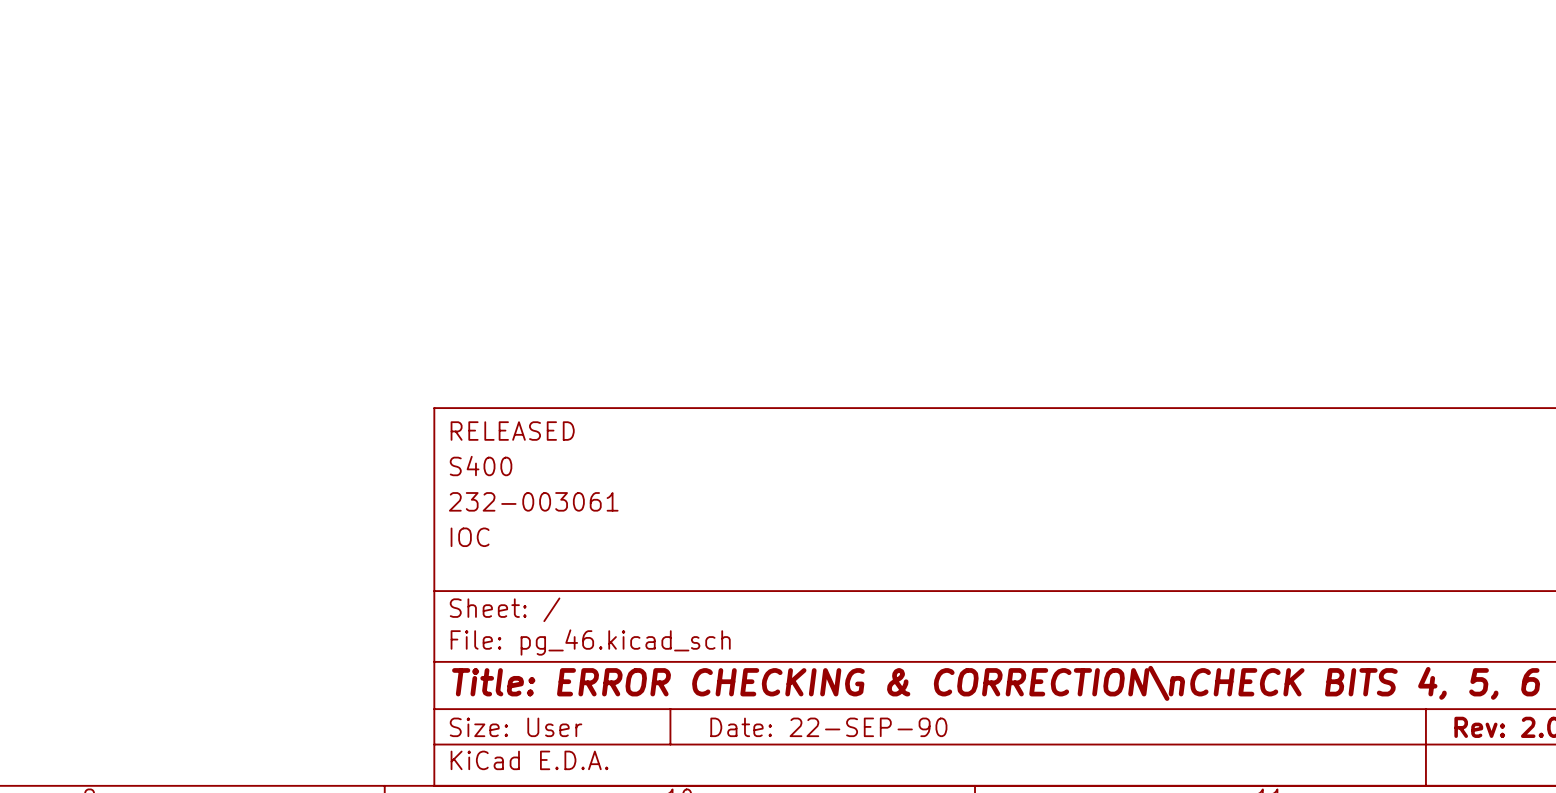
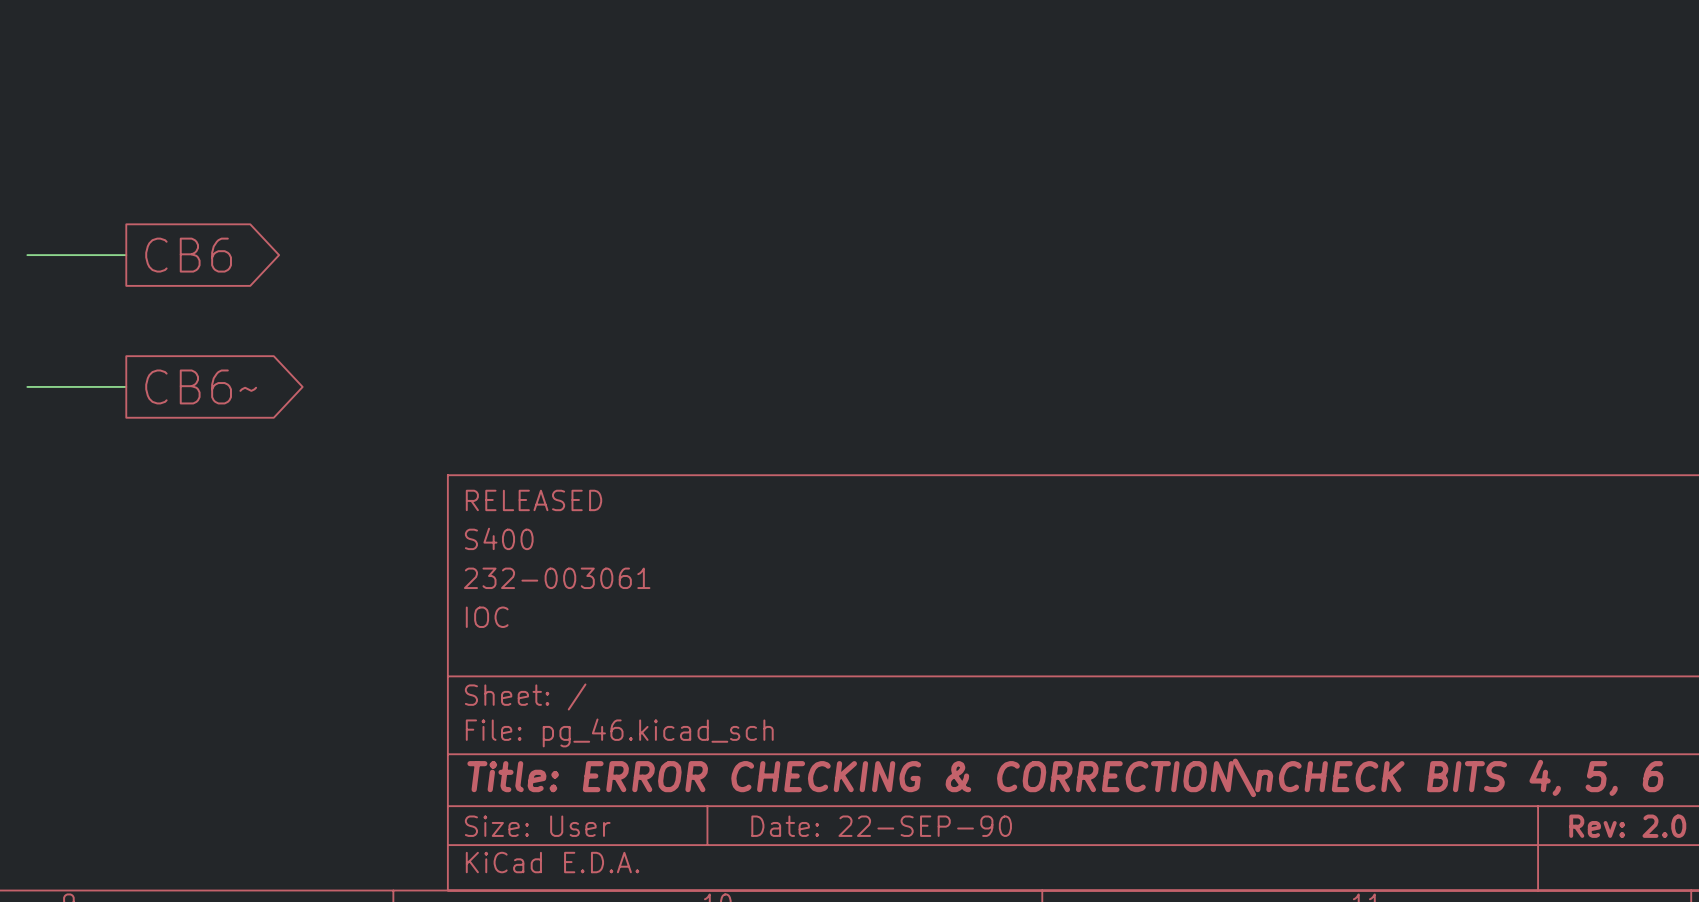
wire: none -> (27, 255) (126, 255)
global label: none -> CB6 (188, 255)
wire: none -> (27, 386) (126, 386)
global label: none -> CB6~ (201, 386)

